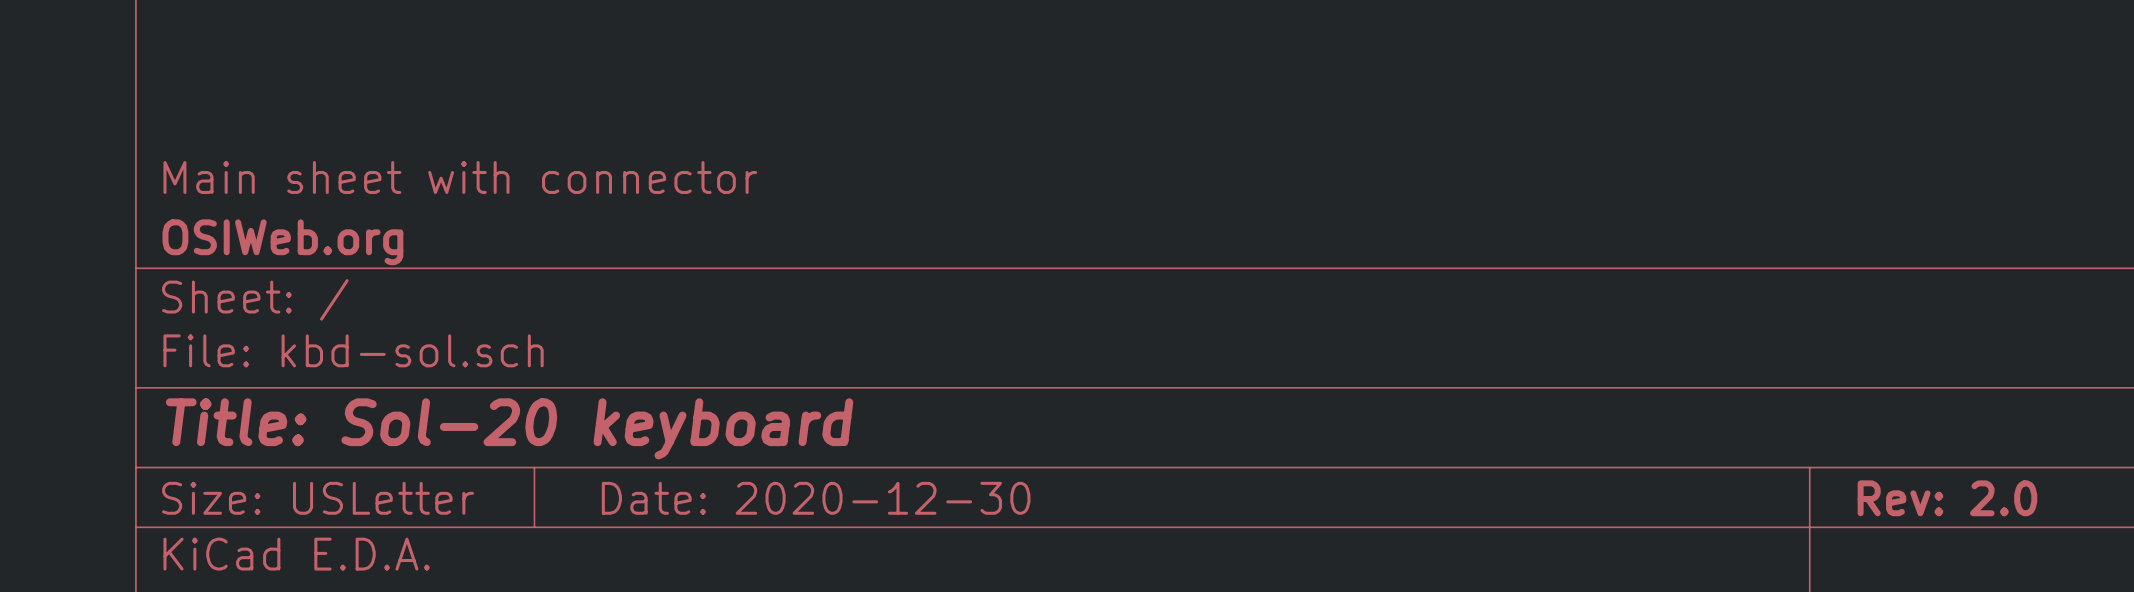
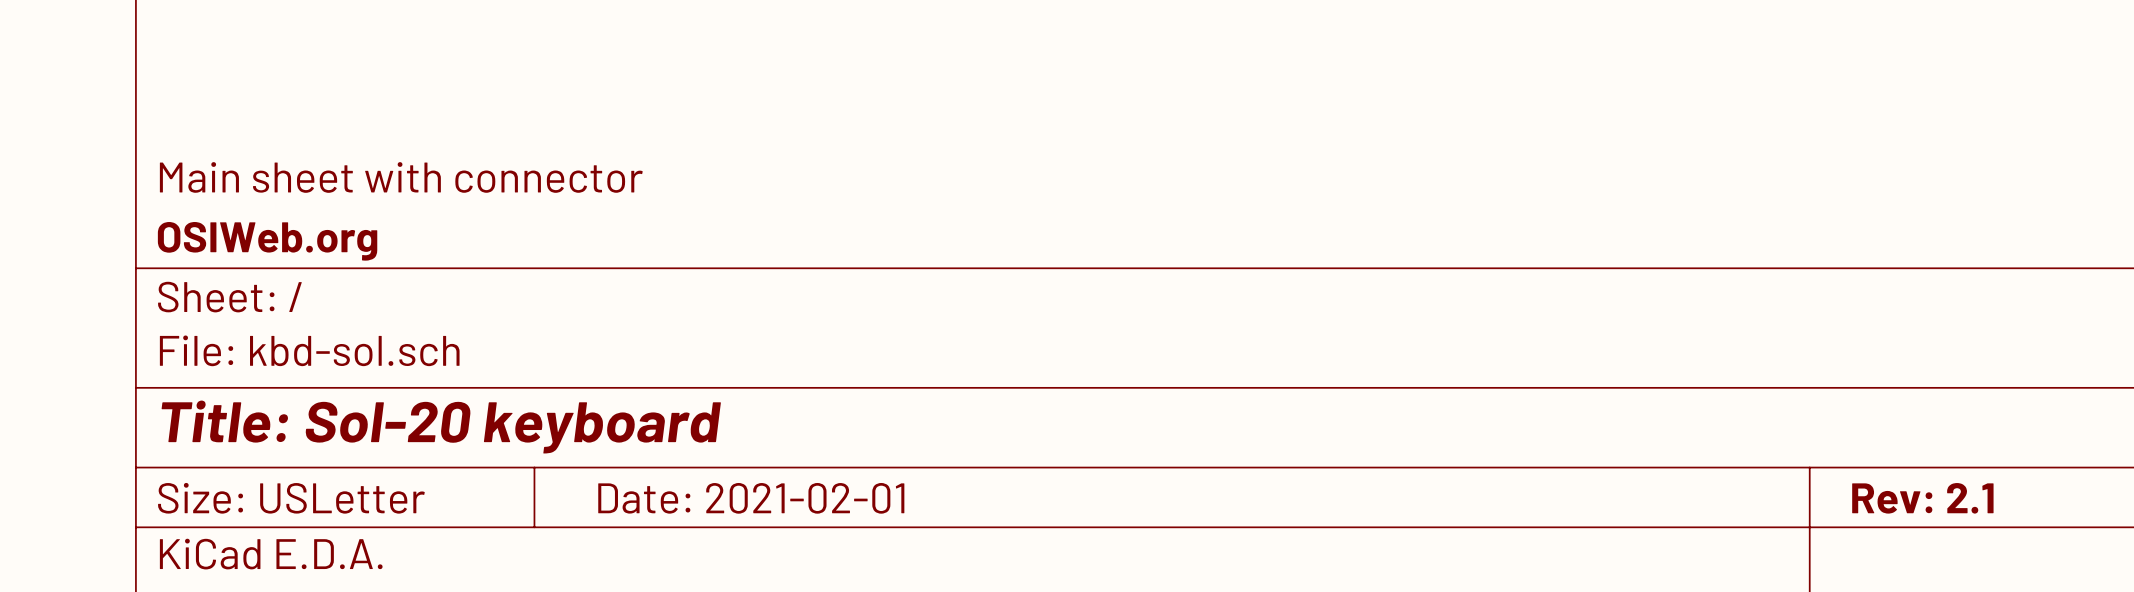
title block: Date: 2020-12-30 (816, 498) -> Date: 2021-02-01 (751, 498)
title block: Rev: 2.0 (1947, 498) -> Rev: 2.1 (1922, 498)

